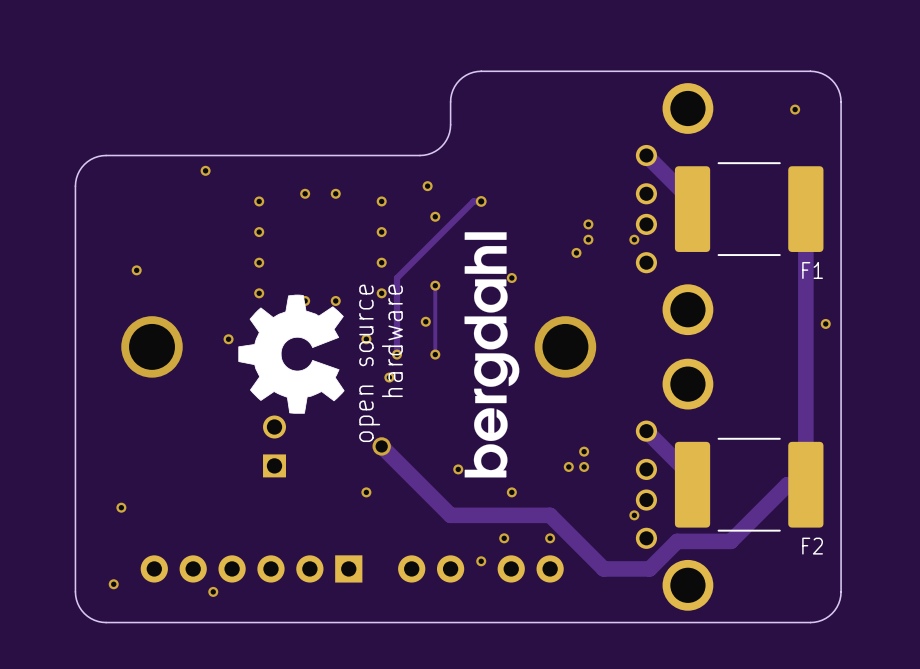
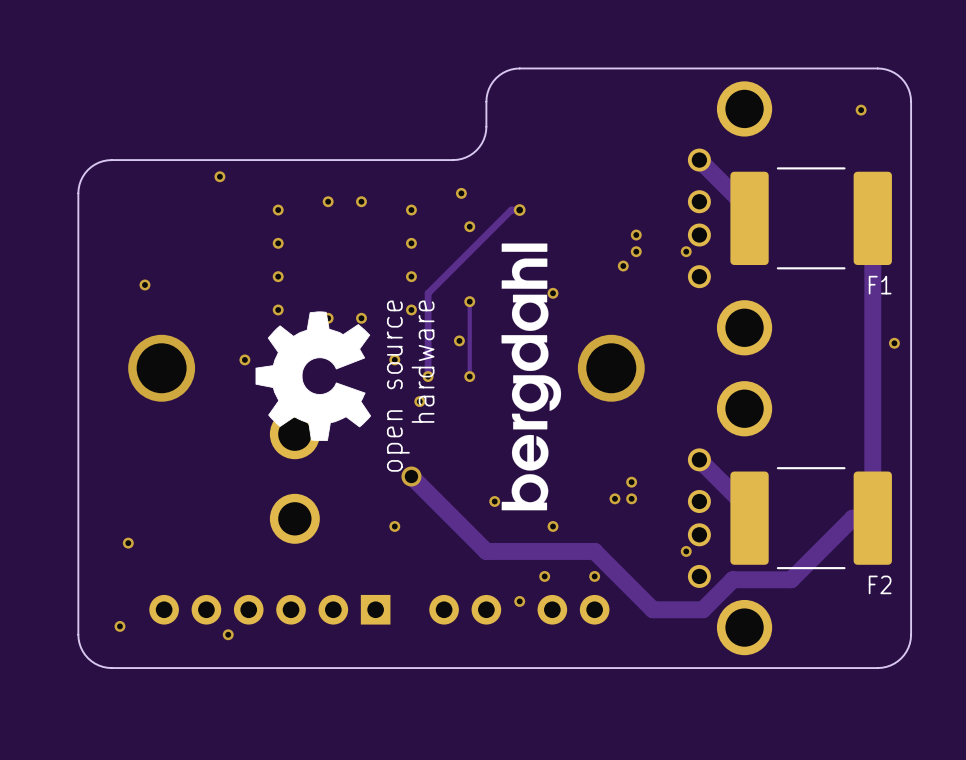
part footprint: [263, 415, 286, 478] -> [269, 409, 320, 544]

